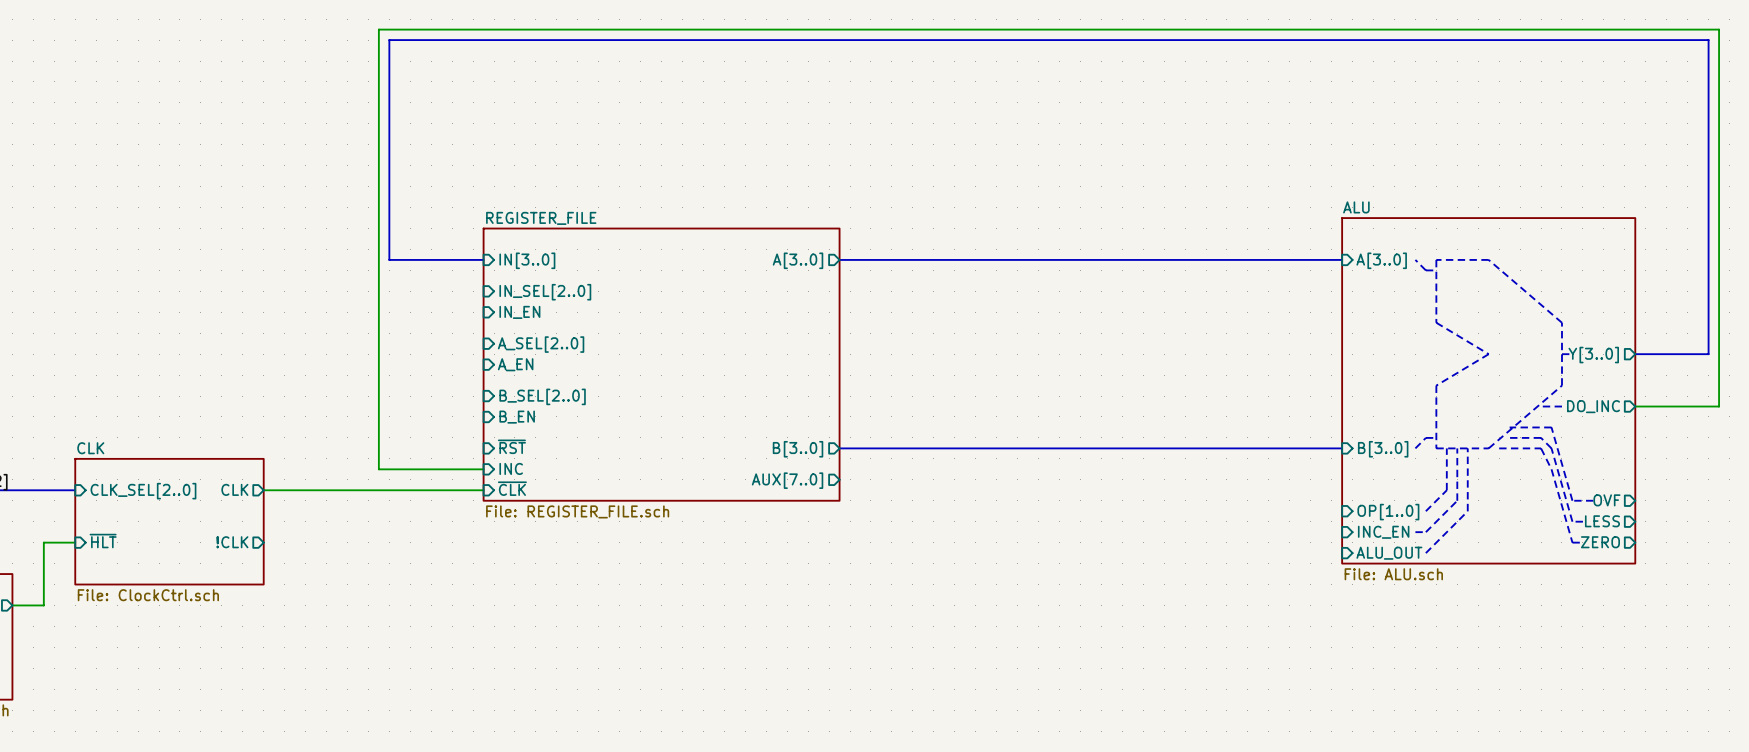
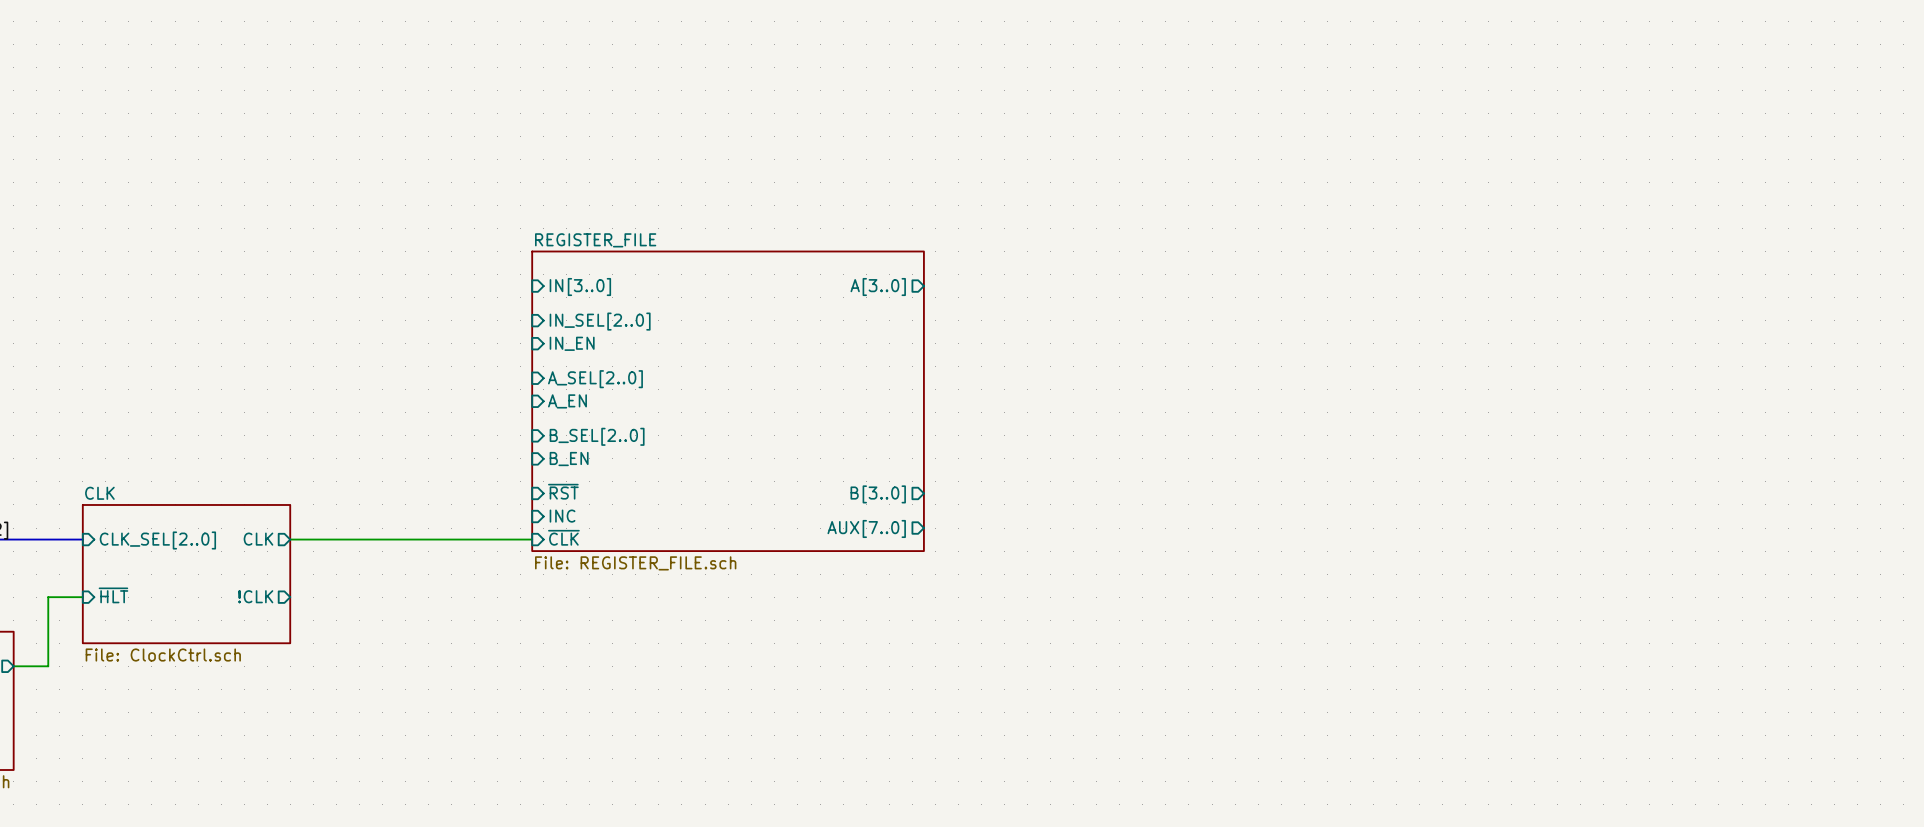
bus: (483, 259) (389, 259) (389, 40) (1708, 40) (1708, 354) (1635, 354) -> none
bus: (839, 259) (1342, 259) -> none
line: (1415, 259) (1425, 270) (1436, 270) -> none
line: (1436, 259) (1436, 322) (1488, 354) (1436, 385) (1436, 448) (1488, 448) (1561, 385) (1561, 322) (1488, 259) (1436, 259) -> none
sheet pin: A[3..0] (1381, 260) -> none
line: (1561, 354) (1572, 354) -> none
sheet pin: Y[3..0] (1593, 355) -> none
sheet ALU: File: ALU.sch (1488, 390) -> none
line: (1541, 406) (1561, 406) -> none
sheet pin: DO_INC (1593, 406) -> none
wire: (1635, 406) (1719, 406) (1719, 29) (378, 29) (378, 469) (483, 469) -> none
line: (1509, 427) (1551, 427) (1572, 500) (1593, 500) -> none
line: (1436, 437) (1425, 437) (1415, 448) -> none
line: (1509, 437) (1541, 437) (1551, 448) (1572, 521) (1582, 521) -> none
bus: (839, 448) (1342, 448) -> none
line: (1446, 448) (1446, 490) (1425, 511) -> none
line: (1457, 448) (1457, 500) (1425, 532) (1415, 532) -> none
line: (1467, 448) (1467, 511) (1425, 553) -> none
line: (1499, 448) (1541, 448) (1551, 469) (1572, 542) (1582, 542) -> none
sheet pin: B[3..0] (1383, 449) -> none
sheet pin: OVF (1606, 500) -> none
sheet pin: OP[1..0] (1388, 512) -> none
sheet pin: LESS (1602, 521) -> none
sheet pin: INC_EN (1383, 532) -> none
sheet pin: ZERO (1600, 542) -> none
sheet pin: ALU_OUT (1389, 553) -> none

